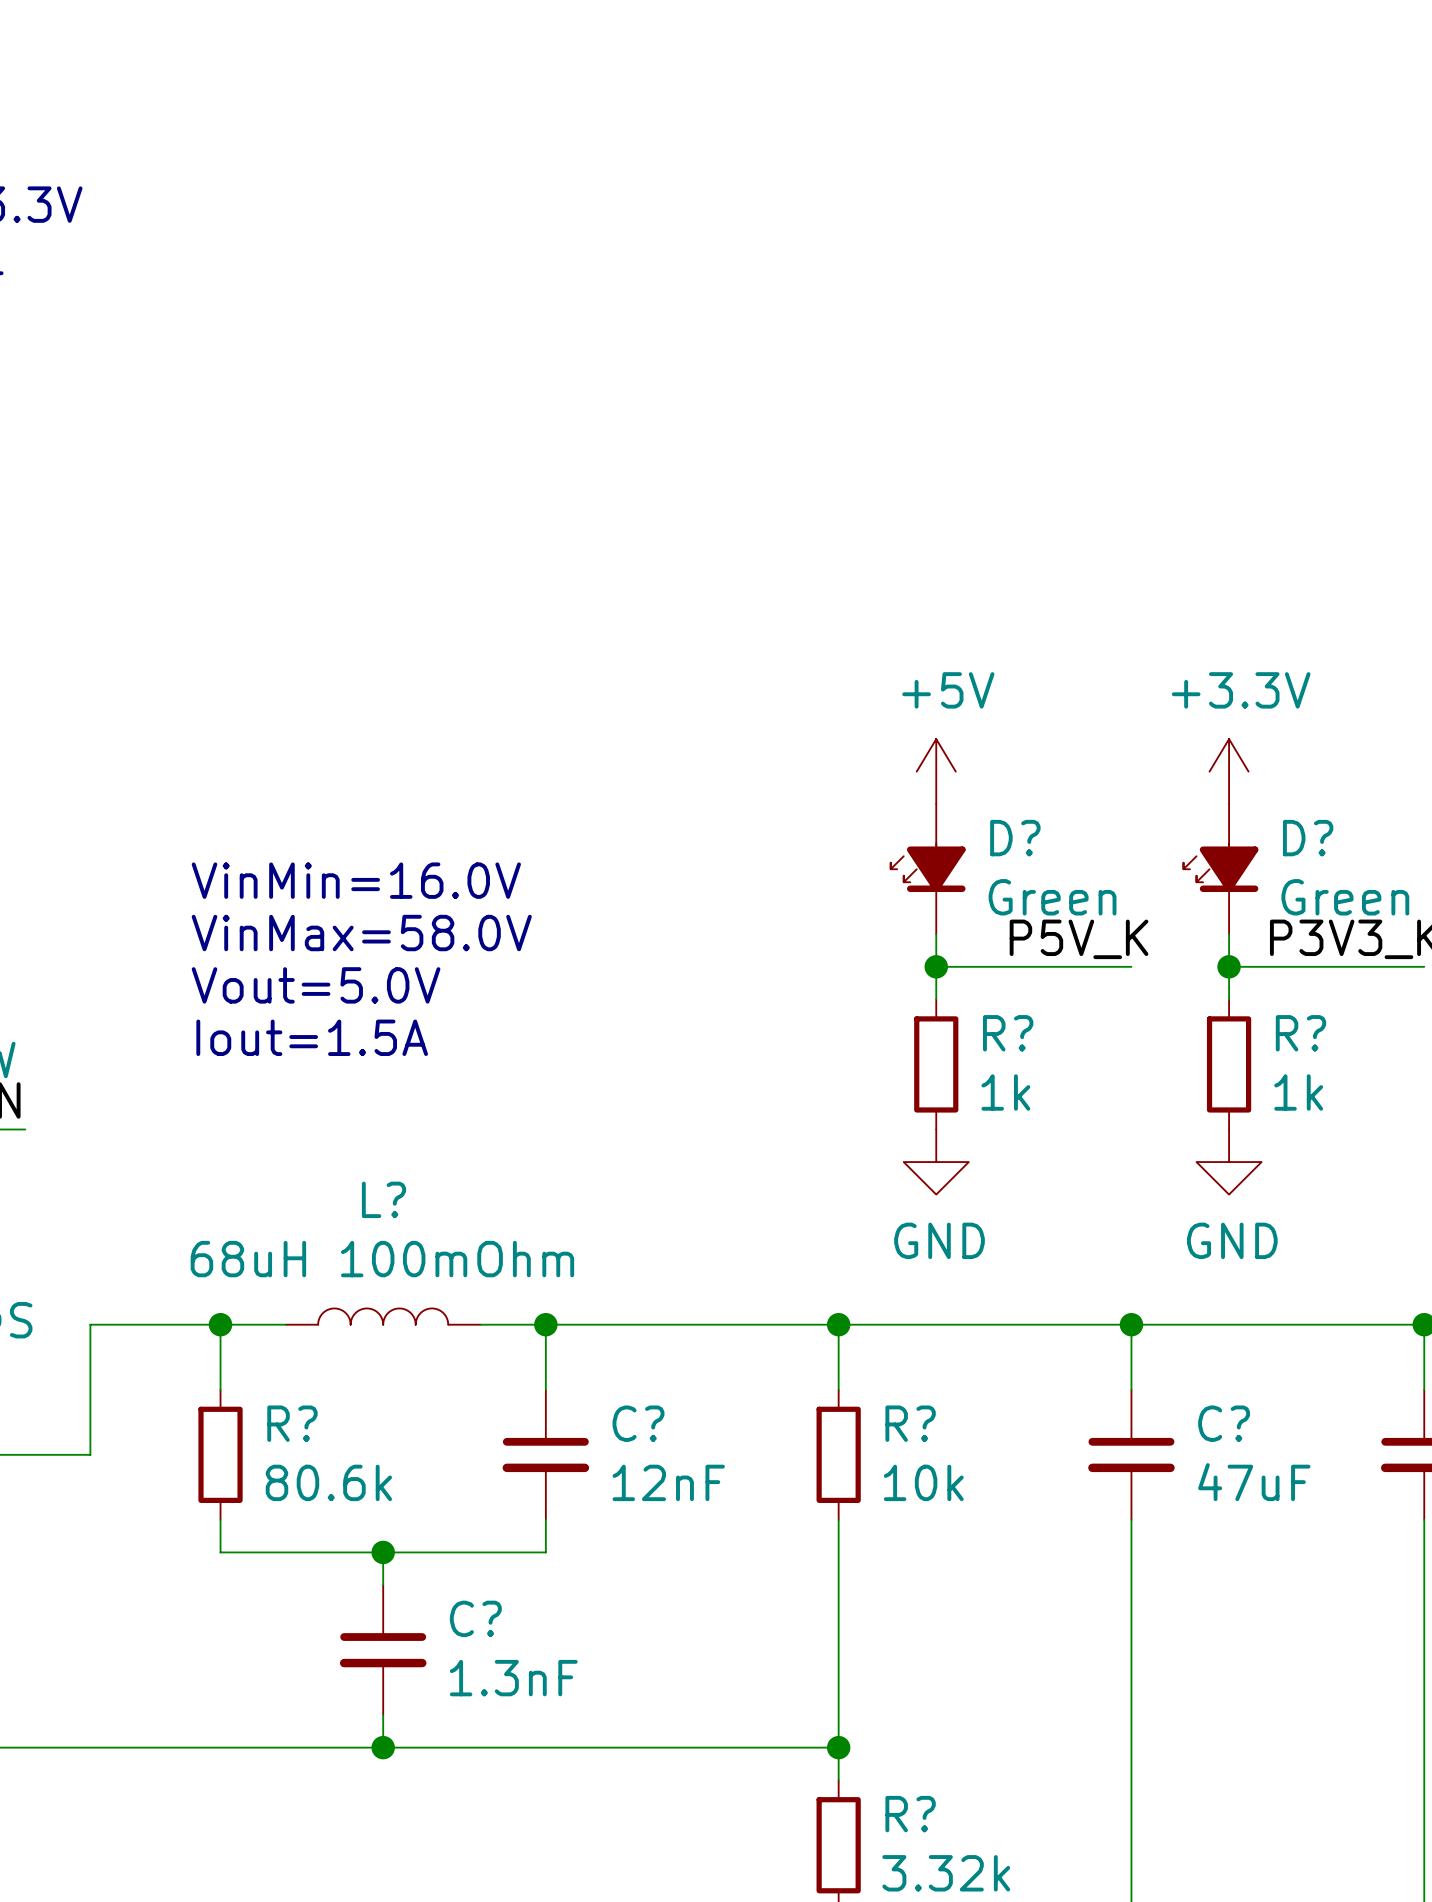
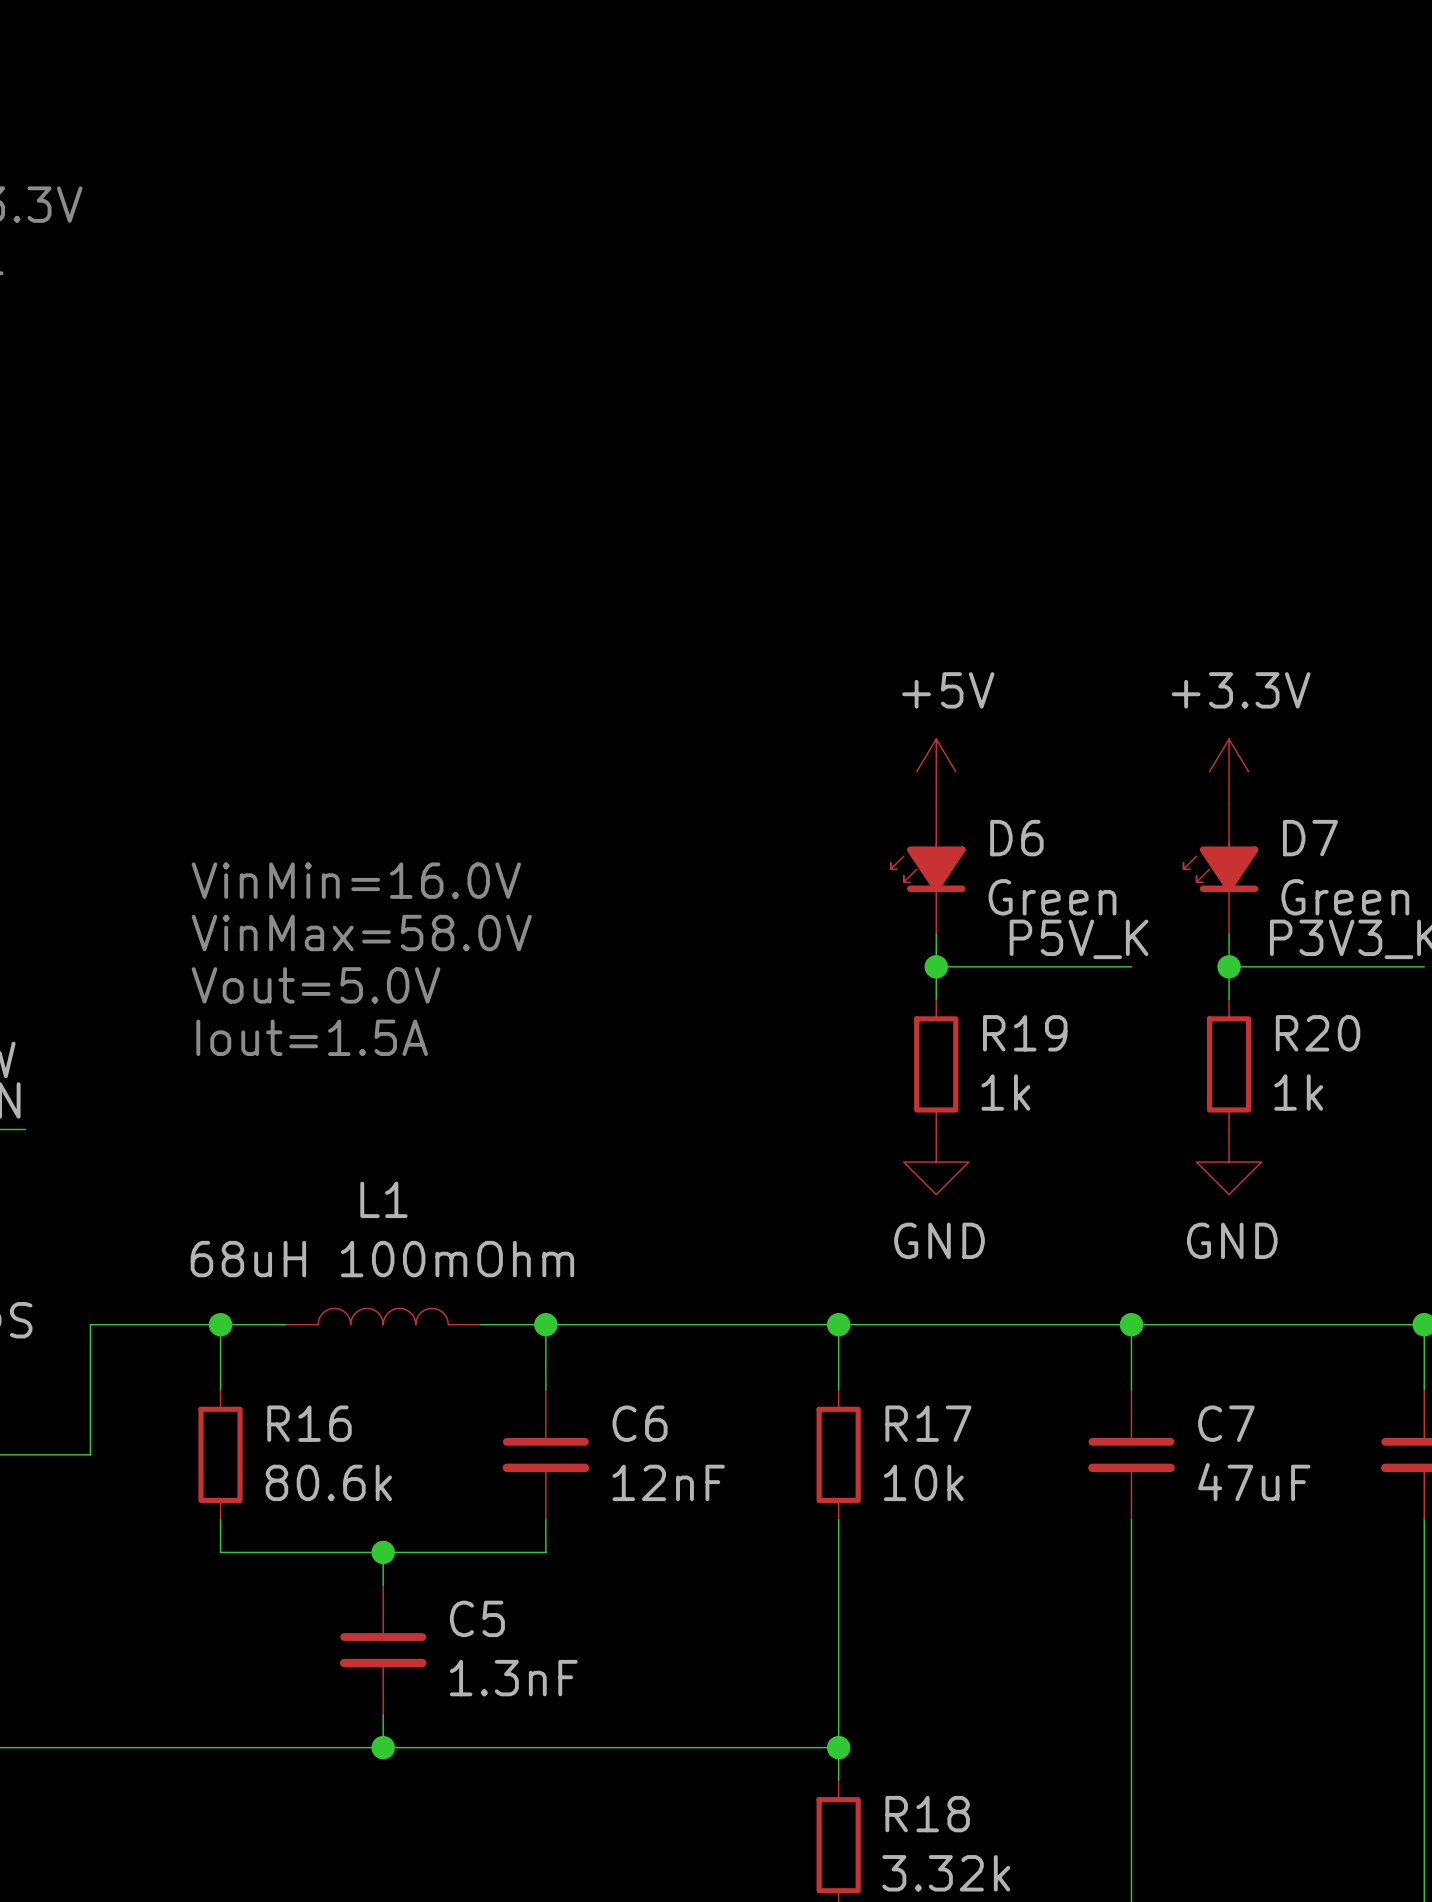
D? name: D? (1015, 838) -> D6 (1016, 838)
D? name: D? (1308, 838) -> D7 (1310, 838)
R? name: R? (1008, 1033) -> R19 (1025, 1033)
R? name: R? (1301, 1033) -> R20 (1318, 1033)
L? name: L? (383, 1199) -> L1 (383, 1199)
R? name: R? (292, 1423) -> R16 (309, 1423)
C? name: C? (638, 1423) -> C6 (640, 1423)
R? name: R? (910, 1423) -> R17 (928, 1423)
C? name: C? (1224, 1423) -> C7 (1226, 1423)
C? name: C? (475, 1618) -> C5 (477, 1618)
R? name: R? (910, 1814) -> R18 (927, 1814)

